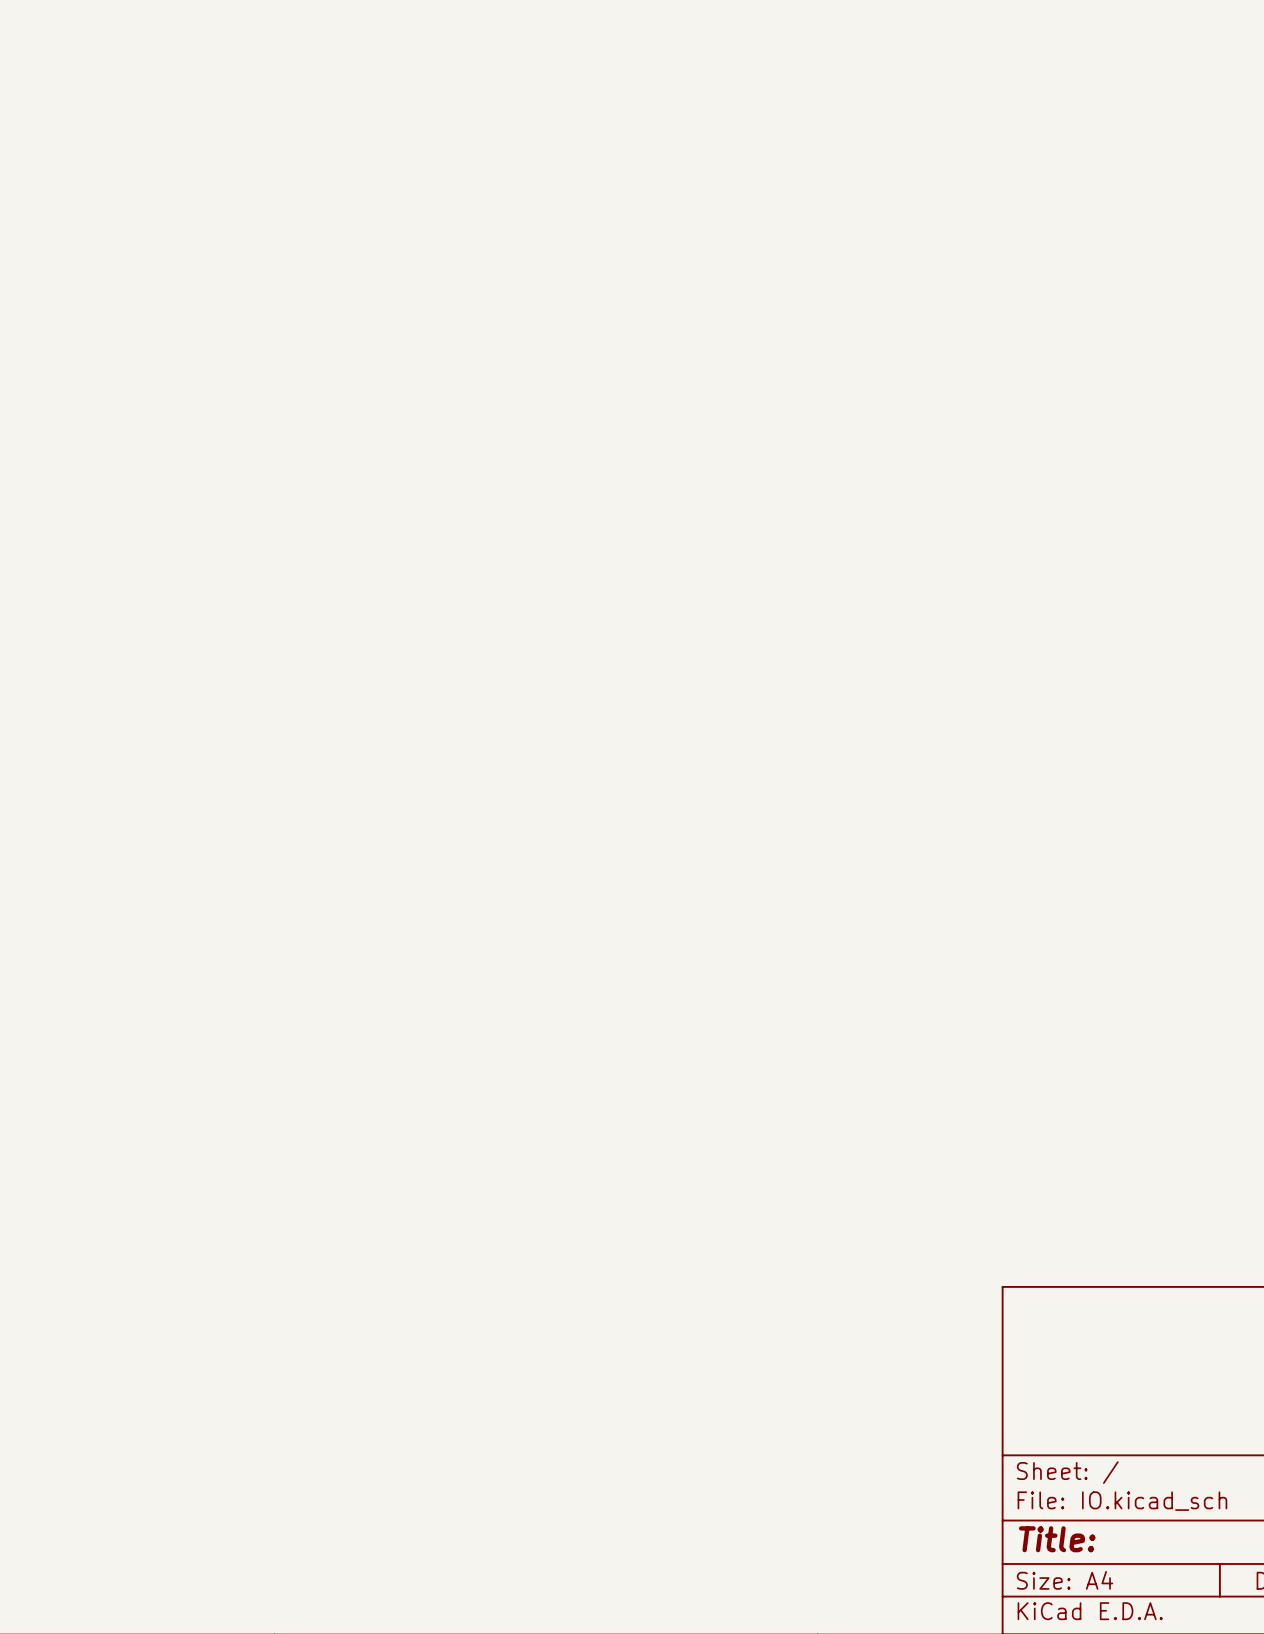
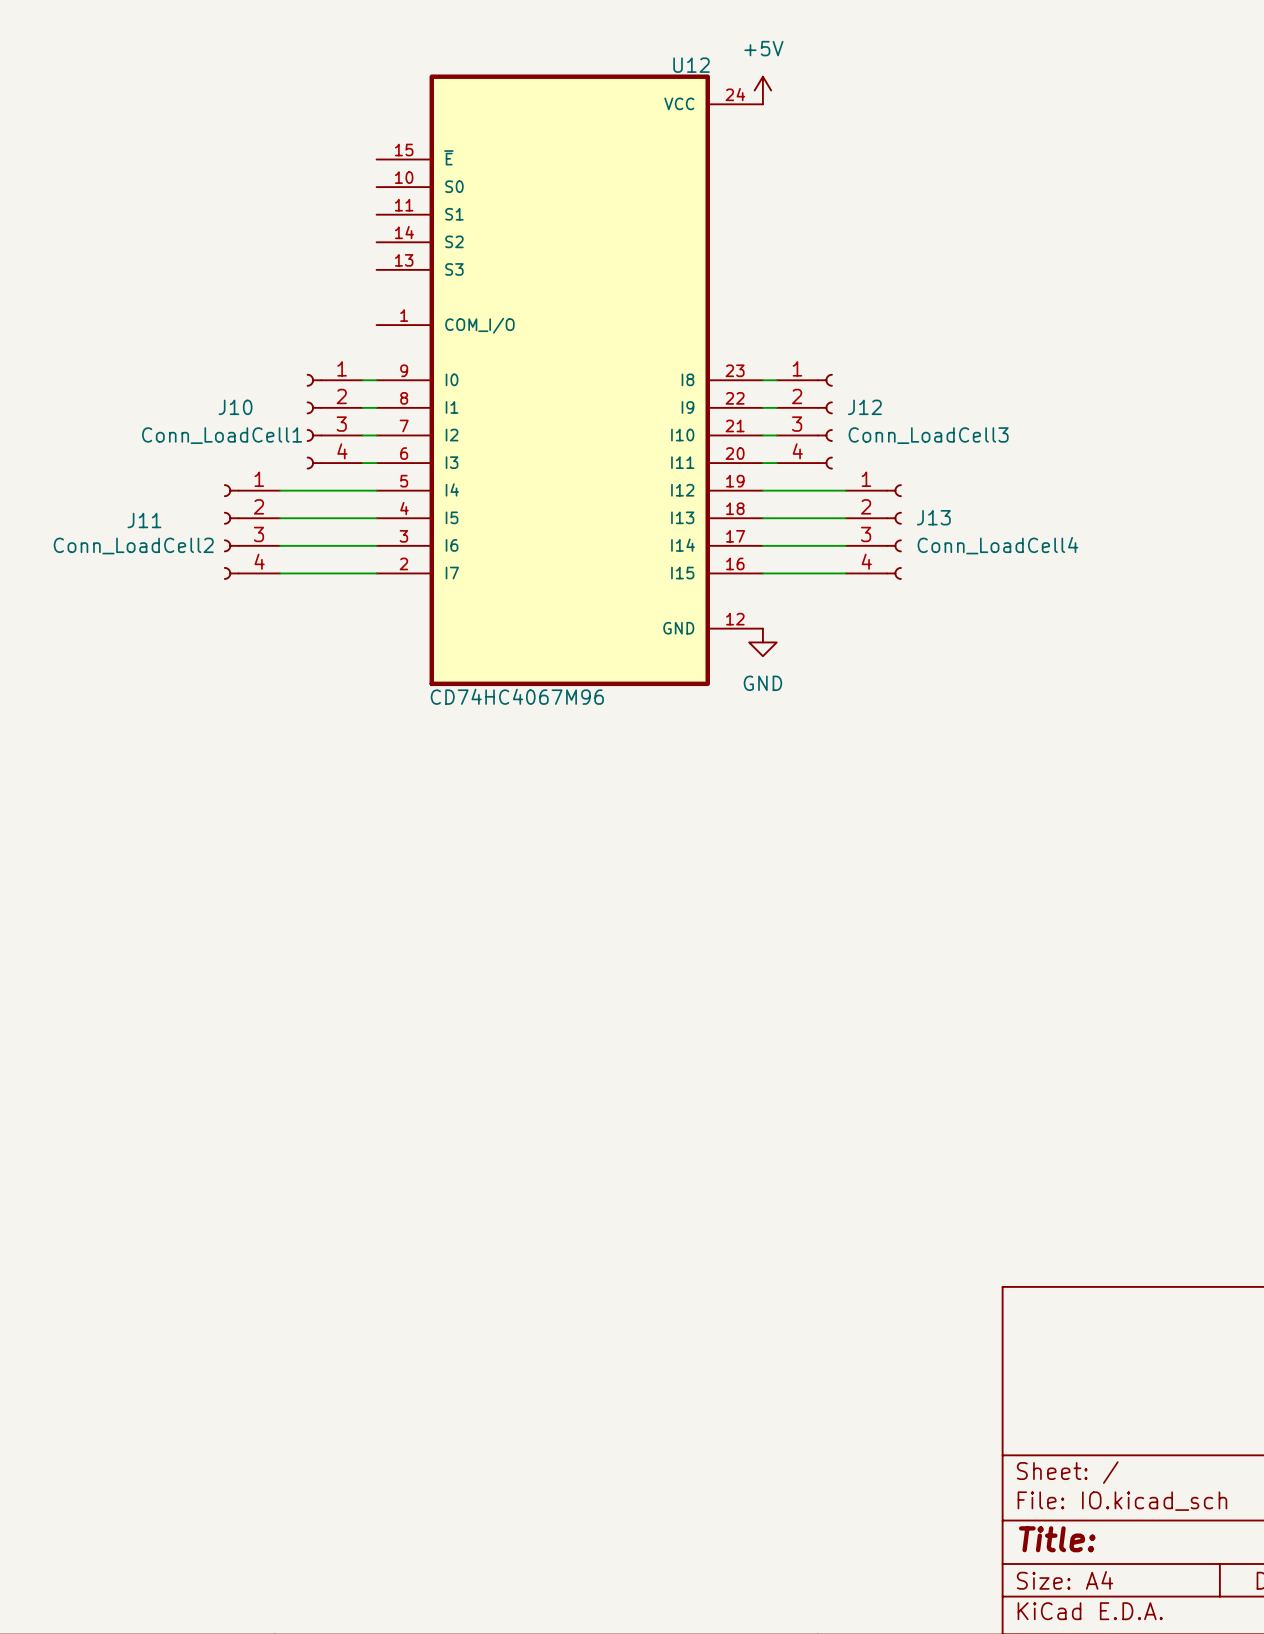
power symbol: none -> +5V (762, 90)
wire: none -> (362, 380) (376, 380)
U12: none -> CD74HC4067M96 (569, 380)
wire: none -> (762, 380) (776, 380)
wire: none -> (362, 407) (376, 407)
wire: none -> (762, 407) (776, 407)
J10: none -> Conn_LoadCell1 (334, 421)
J12: none -> Conn_LoadCell3 (804, 421)
wire: none -> (362, 435) (376, 435)
wire: none -> (762, 435) (776, 435)
wire: none -> (362, 463) (376, 463)
wire: none -> (762, 463) (776, 463)
wire: none -> (280, 490) (376, 490)
wire: none -> (762, 490) (845, 490)
wire: none -> (280, 518) (376, 518)
wire: none -> (762, 518) (845, 518)
J11: none -> Conn_LoadCell2 (251, 532)
J13: none -> Conn_LoadCell4 (873, 532)
wire: none -> (280, 545) (376, 545)
wire: none -> (762, 545) (845, 545)
wire: none -> (280, 573) (376, 573)
wire: none -> (762, 573) (845, 573)
power symbol: none -> GND (762, 642)

